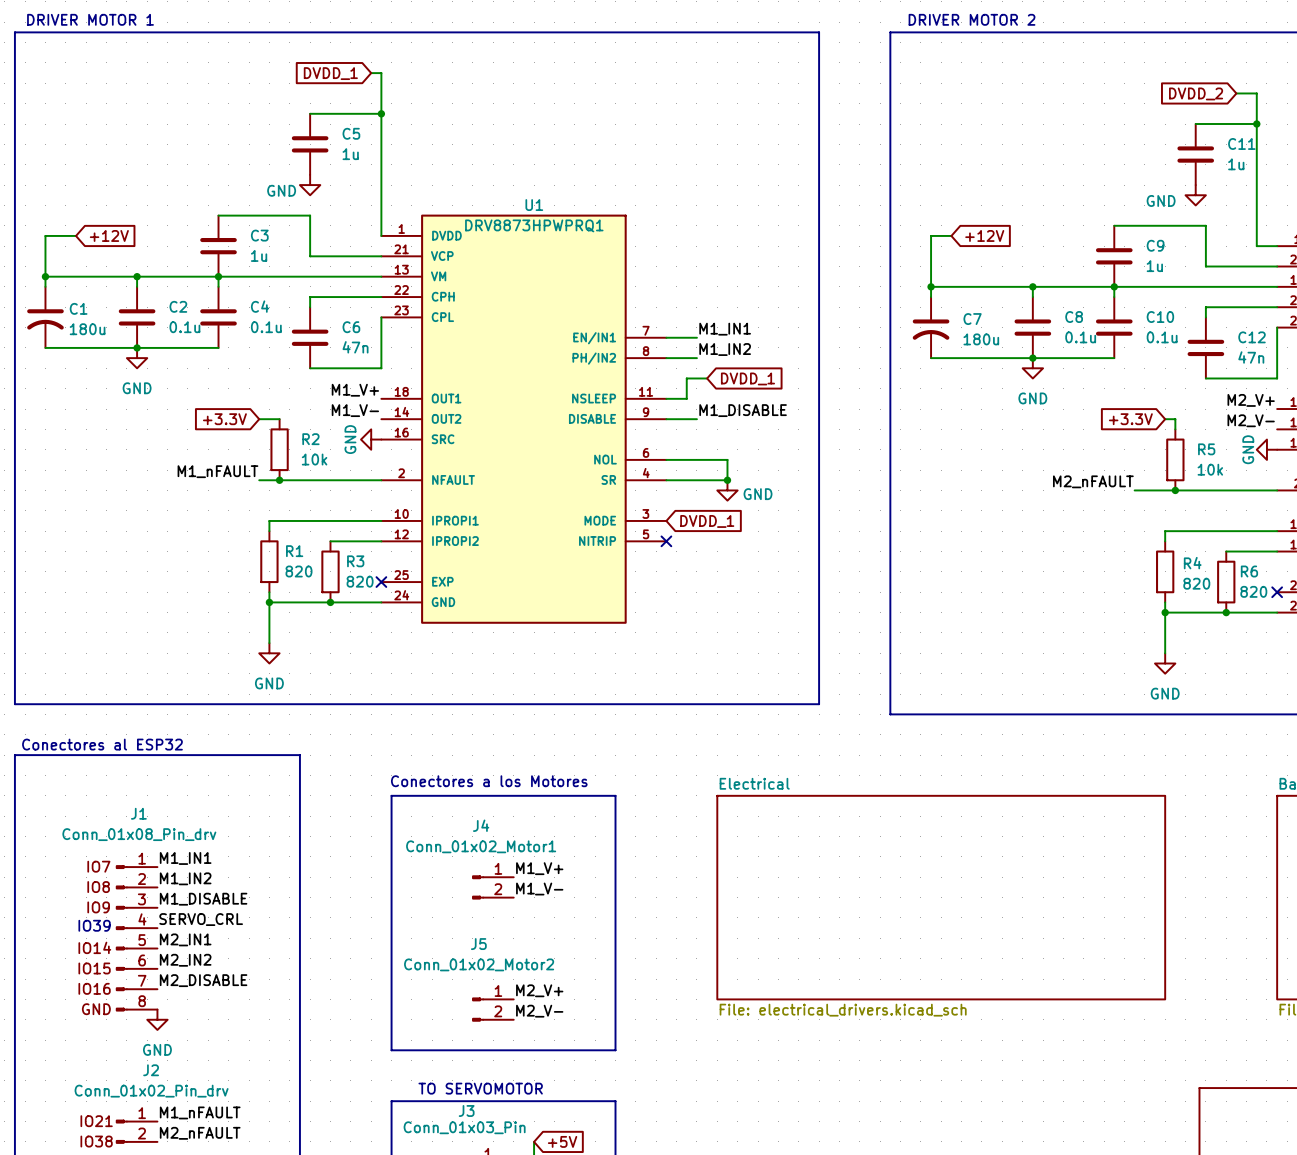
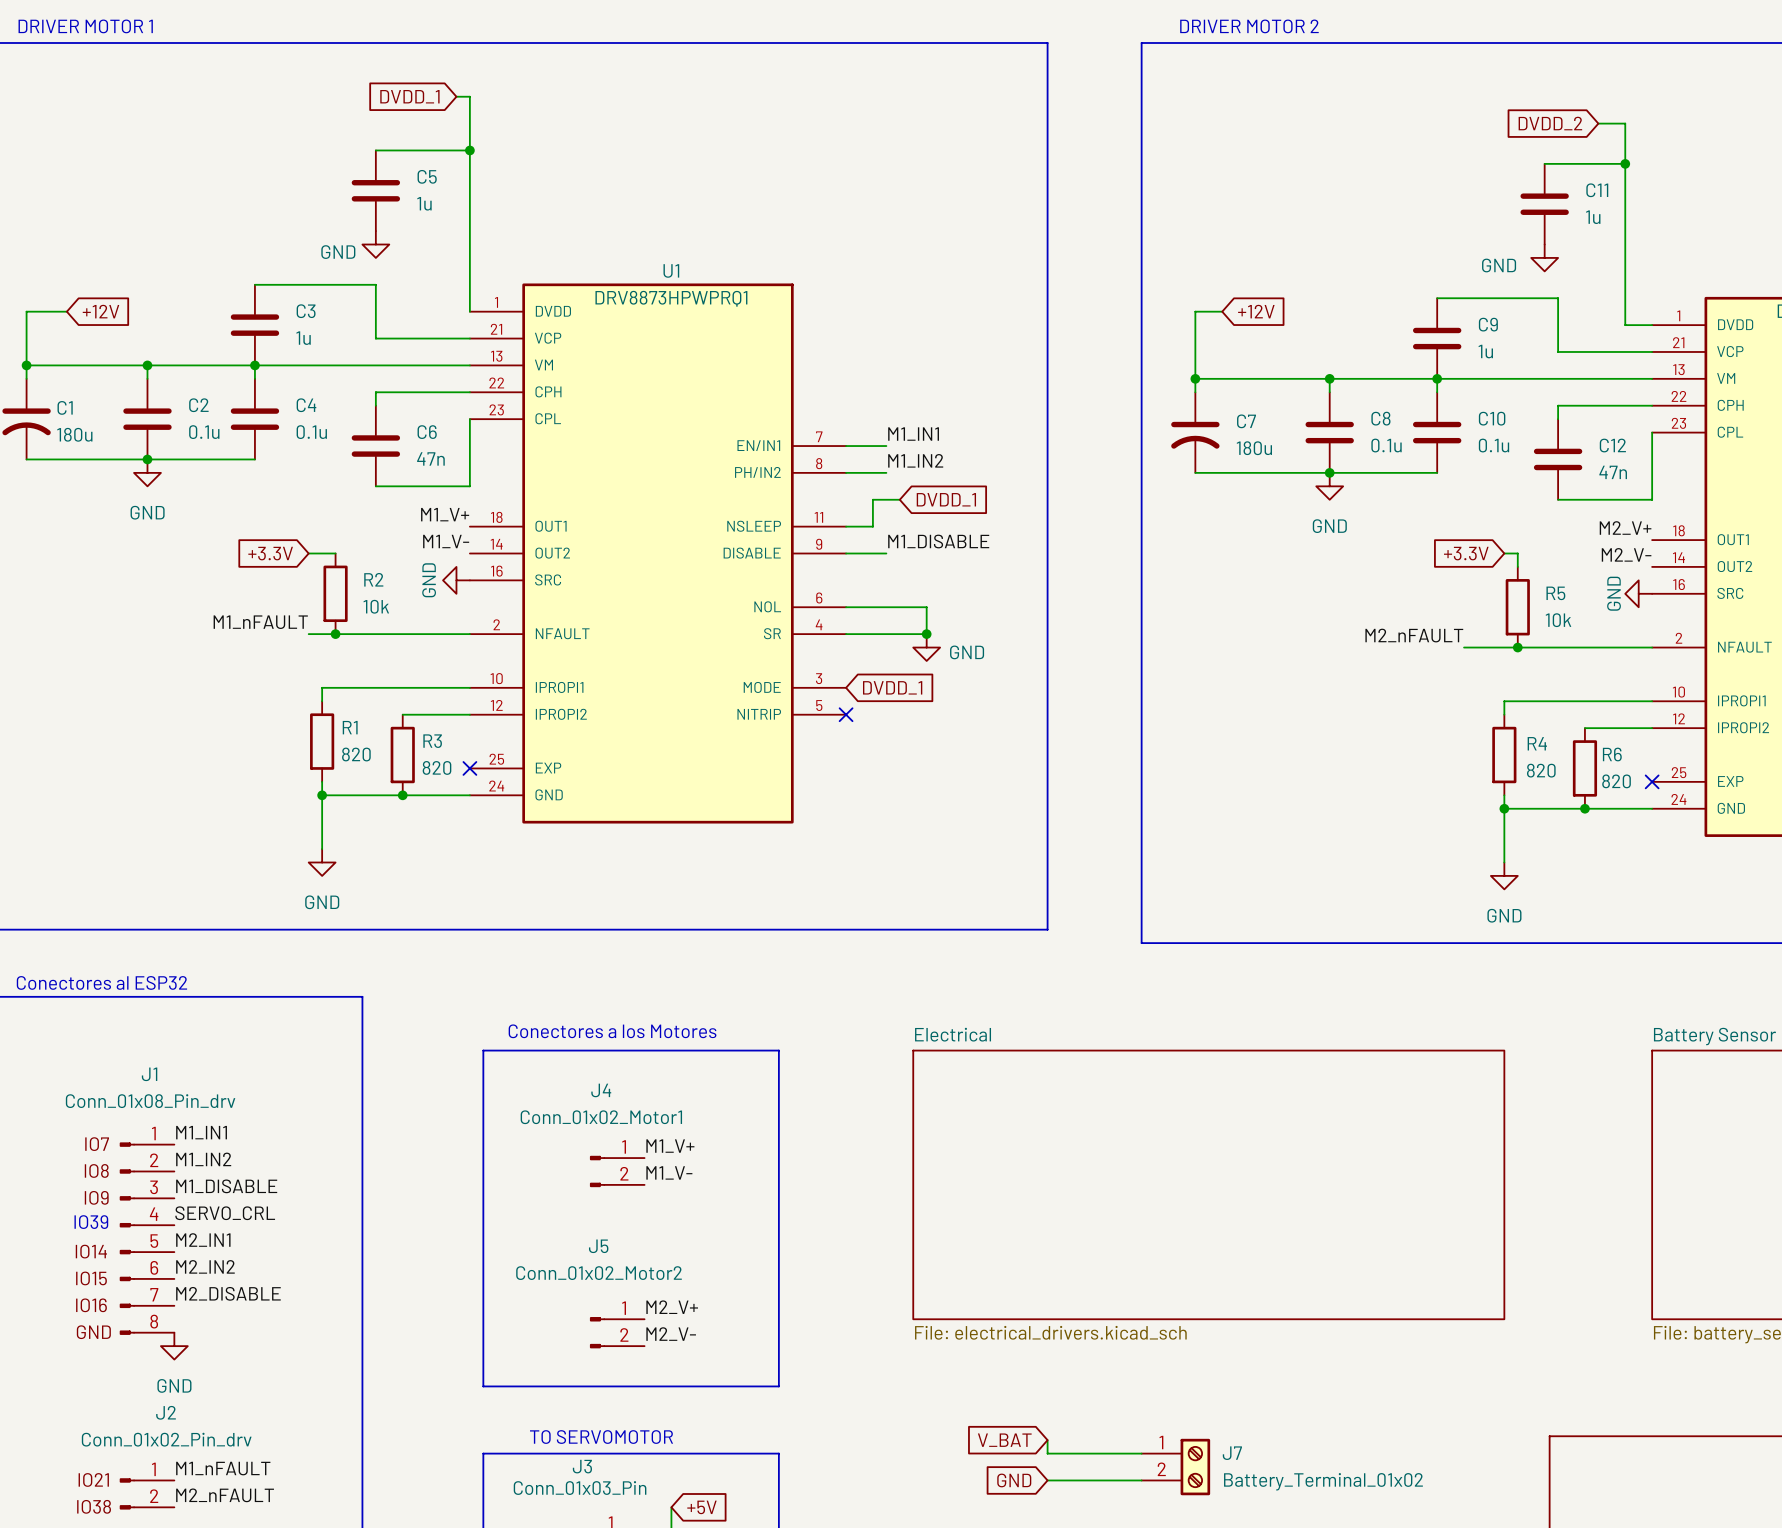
global label: none -> V_BAT (1004, 1440)
wire: none -> (1047, 1440) (1047, 1453) (1141, 1453)
J7: none -> Battery_Terminal_01x02 (1175, 1467)
global label: none -> GND (1014, 1480)
wire: none -> (1047, 1480) (1141, 1480)

